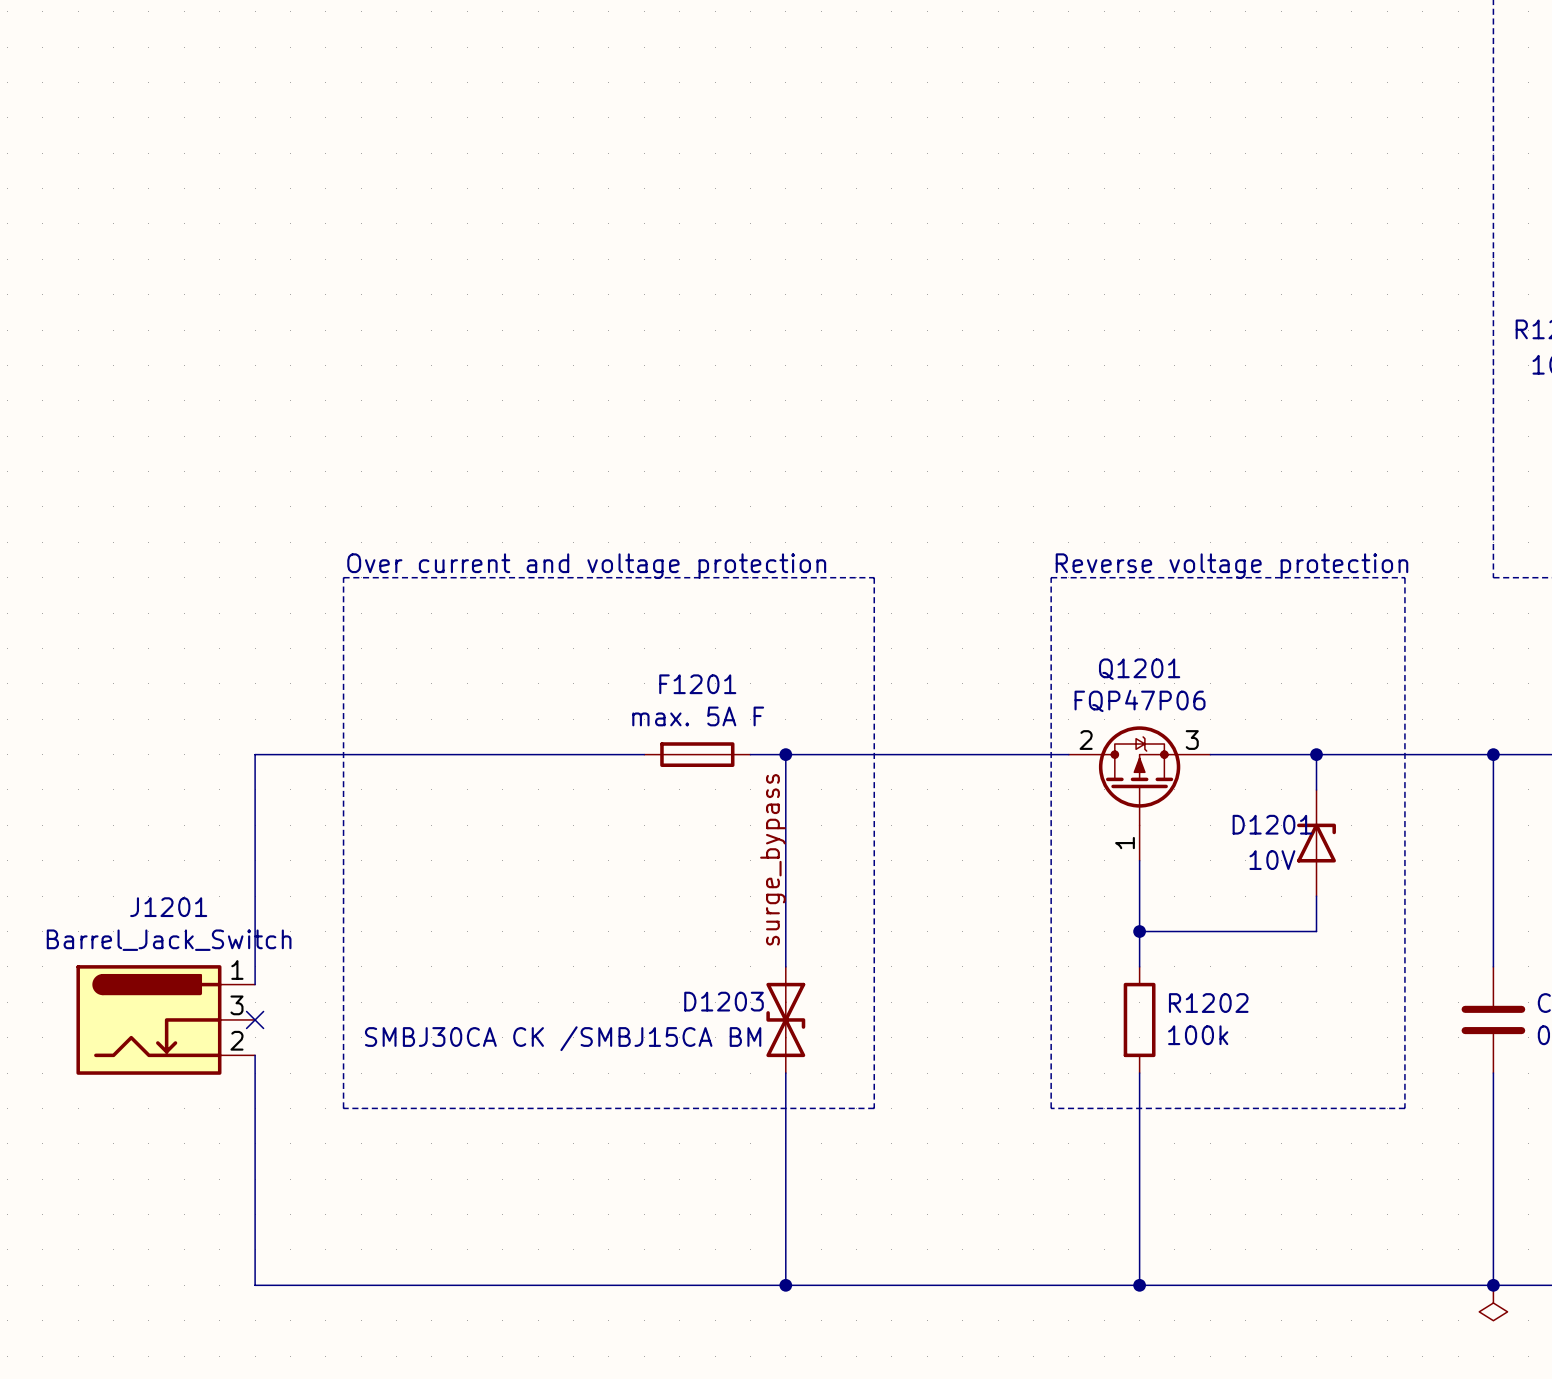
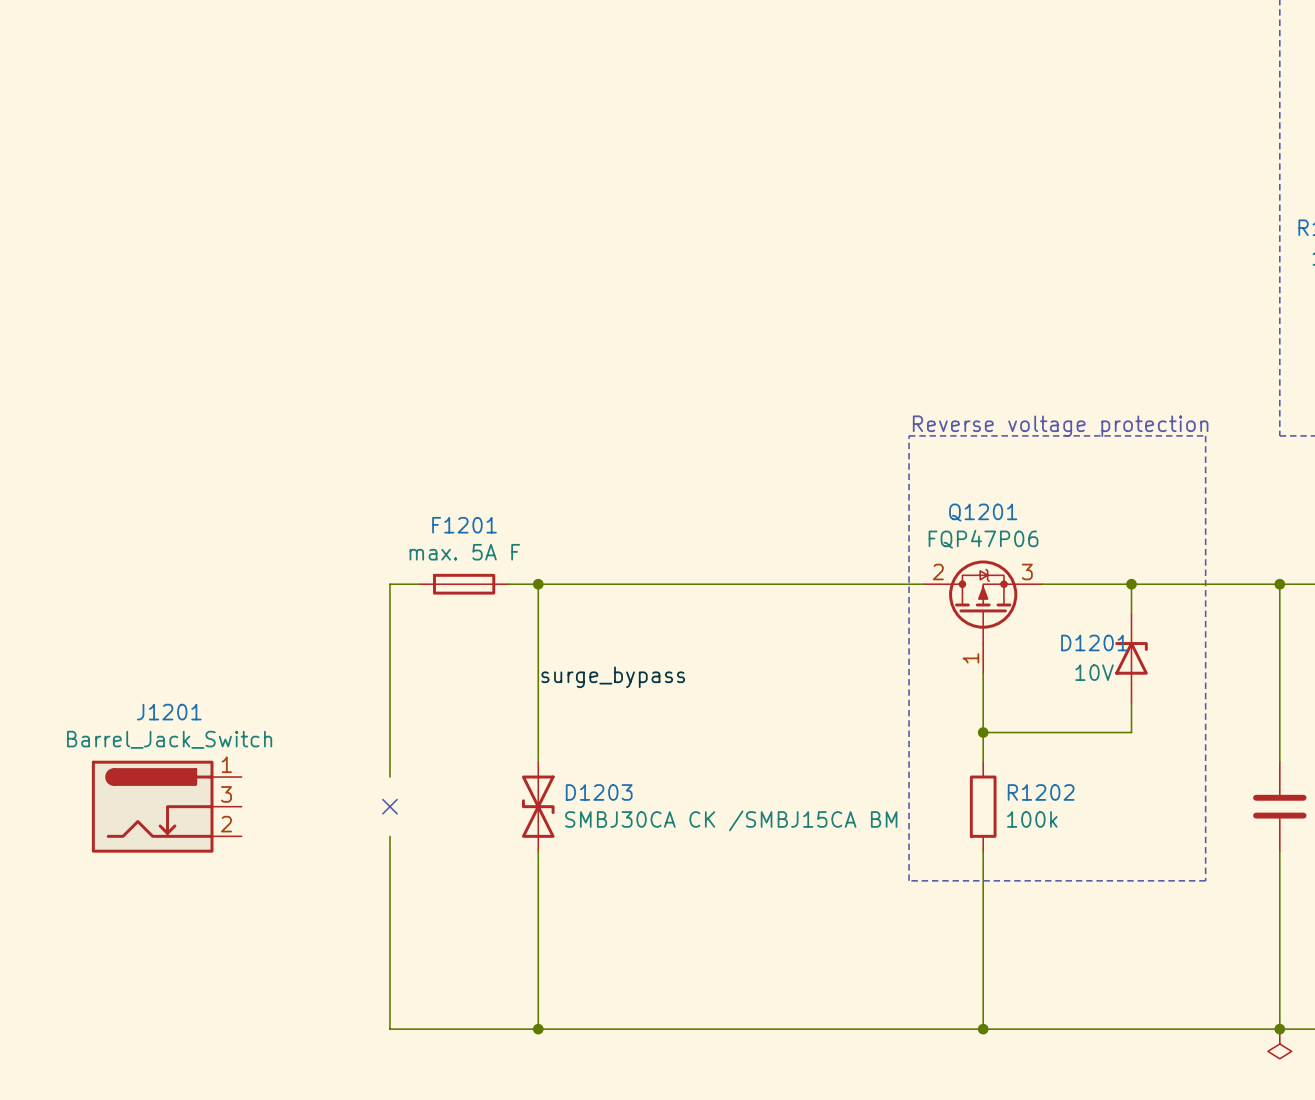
text: Over current and voltage protection (586, 566) -> none
line: (343, 577) (874, 577) (874, 1108) (343, 1108) (343, 577) -> none
wire: (431, 754) (255, 754) (255, 984) -> (389, 584) (389, 777)
junction: none -> (538, 584)
F1201 position: (697, 754) -> (464, 584)
wire: (785, 754) (785, 966) -> (538, 584) (538, 762)
junction: (785, 754) -> none
label rotation: 0° (772, 859) -> 90° clockwise (613, 677)
D1203 name position: D1203 (724, 1001) -> D1203 (599, 792)
no-connect mark: (255, 1019) -> none
no-connect mark: none -> (389, 806)
D1203 position: (785, 1019) -> (538, 806)
D1203 value position: SMBJ30CA CK /SMBJ15CA BM (563, 1038) -> SMBJ30CA CK /SMBJ15CA BM (731, 820)
wire: (255, 1055) (255, 1285) (431, 1285) -> (389, 836) (389, 1029)
wire: (785, 1073) (785, 1285) -> (538, 851) (538, 1029)
junction: none -> (538, 1029)
junction: (785, 1285) -> none

